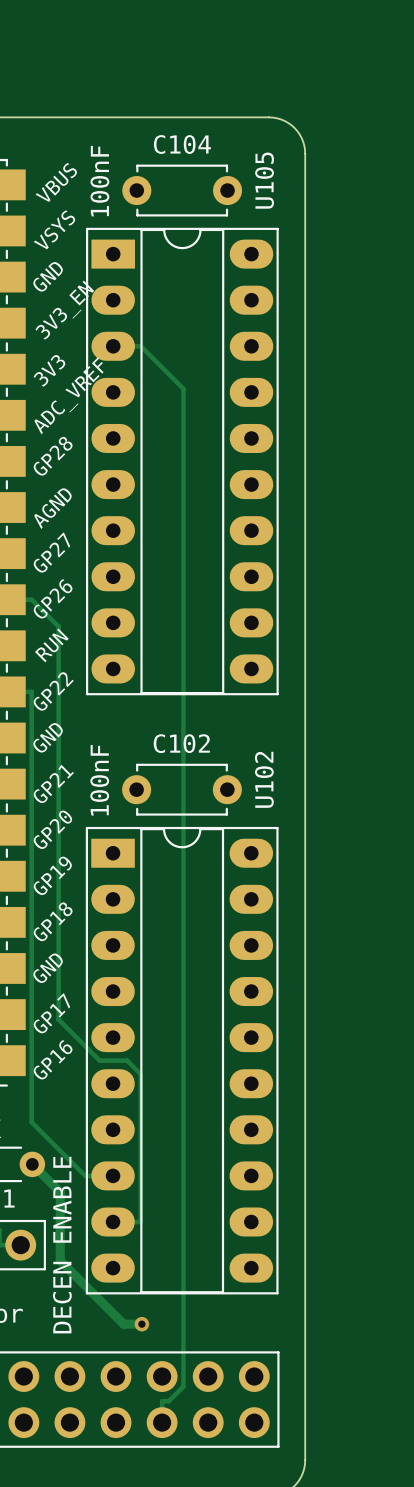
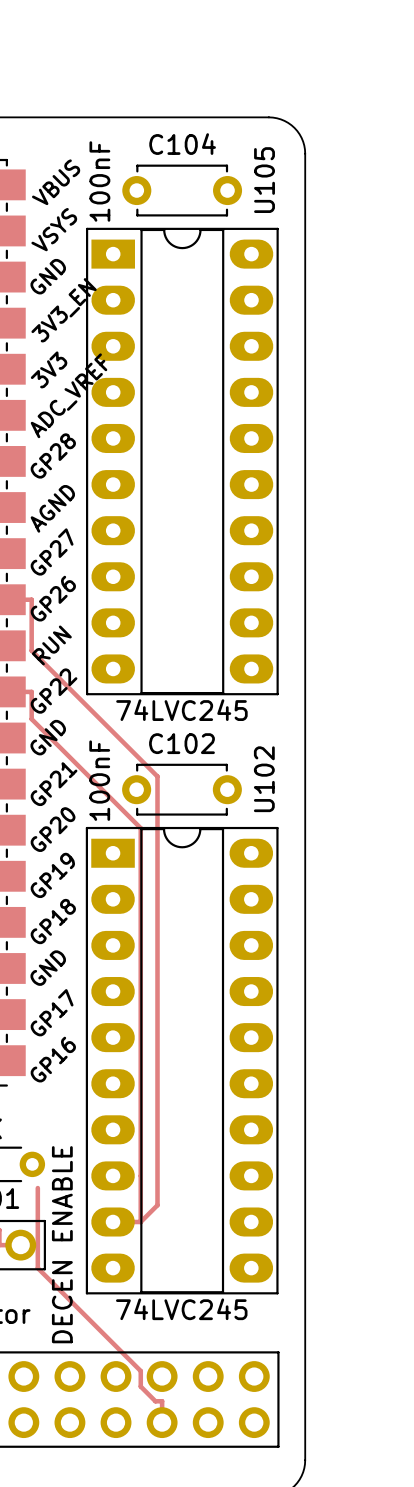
track: (113, 346) (140, 346) (183, 388) (183, 1386) (168, 1401) (162, 1401) -> (37, 1188) (37, 1268) (140, 1371) (140, 1386) (155, 1401) (162, 1401)
track: (31, 599) (58, 626) (58, 1019) (99, 1060) (127, 1060) (140, 1074) -> (31, 599) (31, 650) (157, 776) (157, 1205) (140, 1222)
U105 value: none -> 74LVC245 (181, 710)
track: (31, 719) (31, 1122) (85, 1175) (113, 1175) -> (31, 719) (140, 828) (140, 1074)
track: (32, 1164) (60, 1192) (60, 1260) (123, 1324) (141, 1324) -> none
U102 value: none -> 74LVC245 (181, 1309)
via: (141, 1324) -> none

